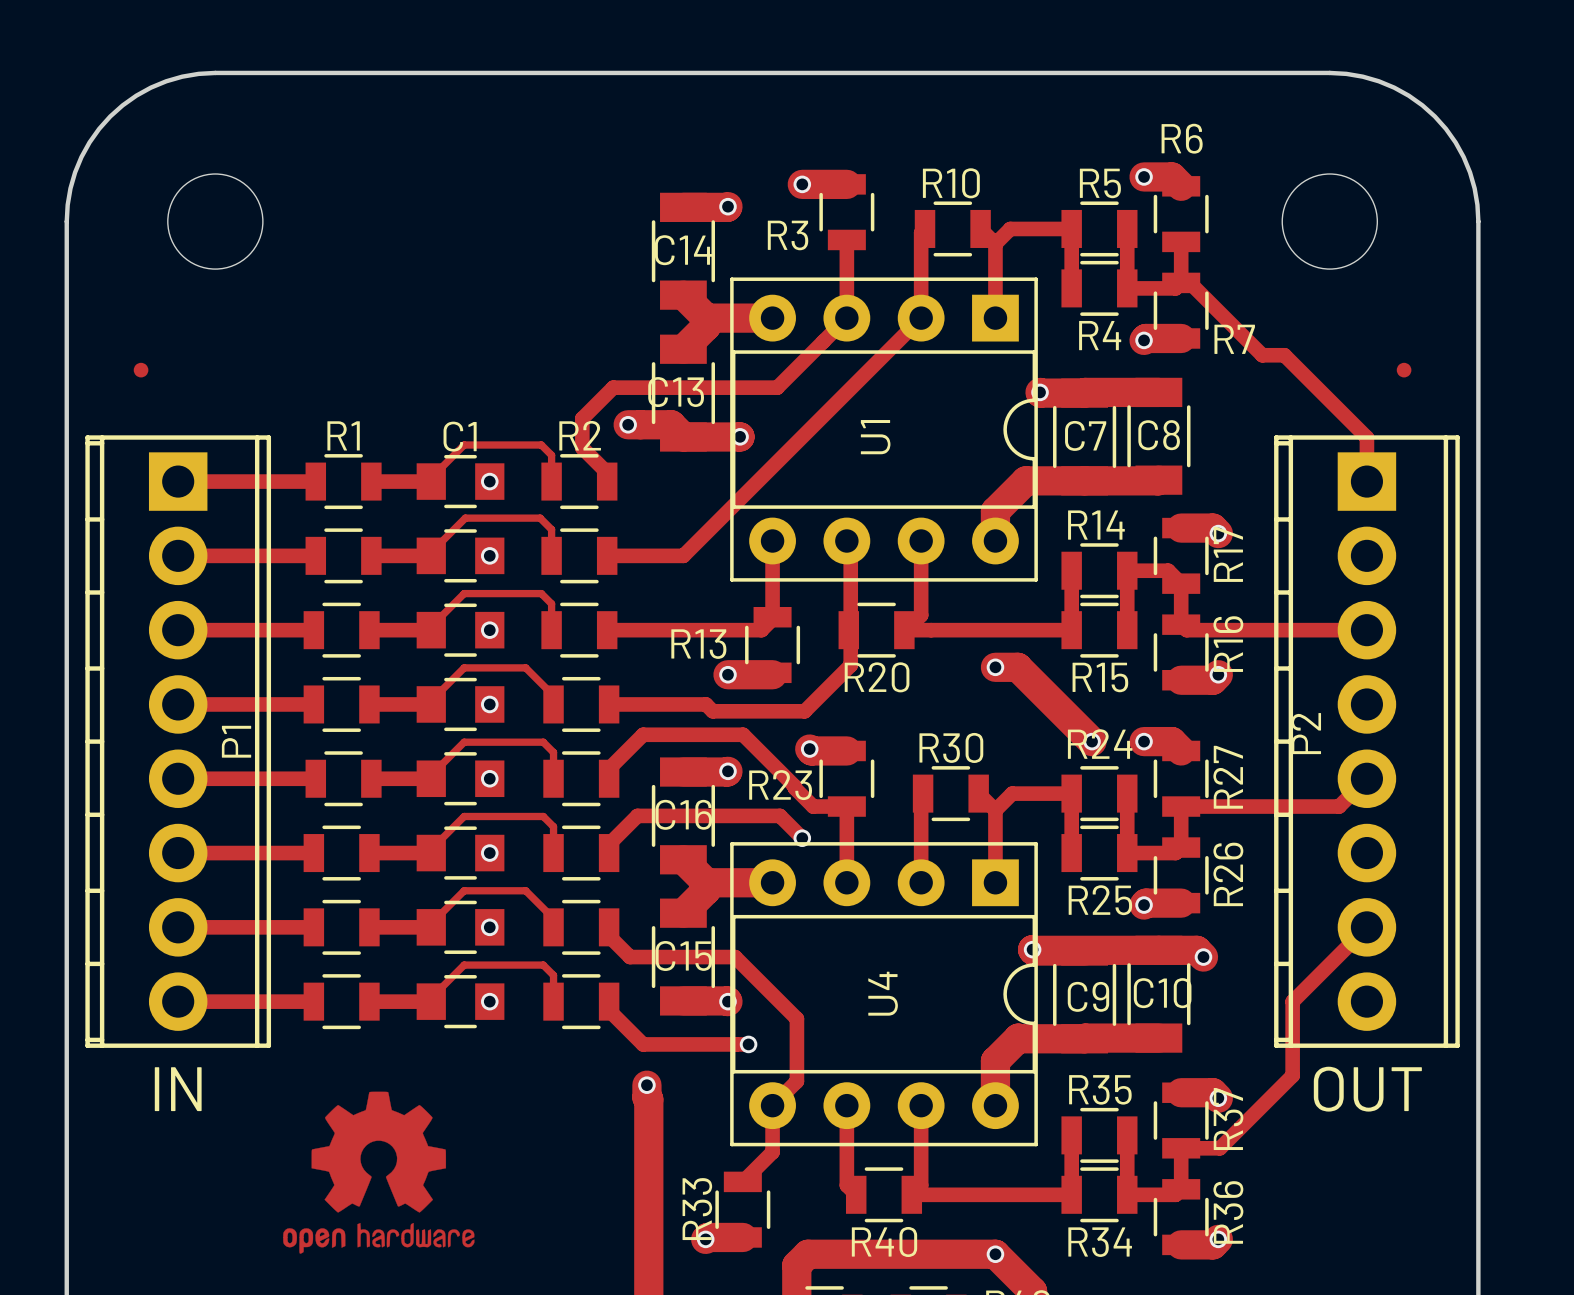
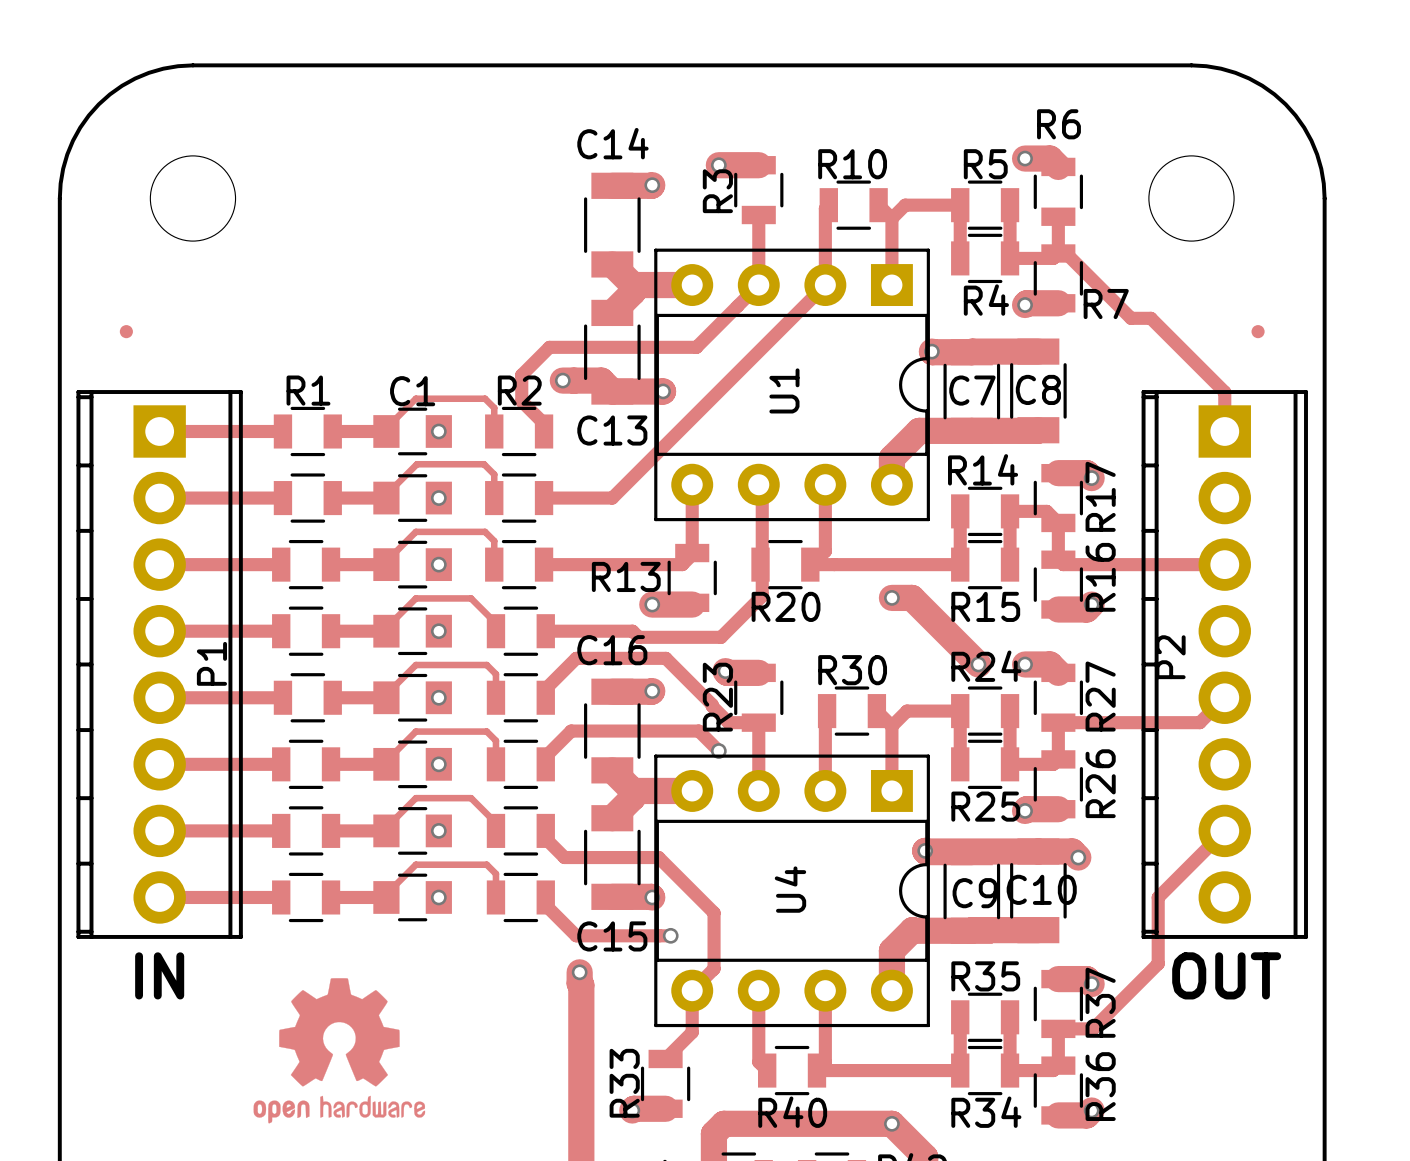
R3 name rotation: 0° (788, 235) -> 90° counterclockwise (717, 191)
C14 name position: C14 (683, 250) -> C14 (612, 143)
C13 name position: C13 (676, 392) -> C13 (612, 430)
R23 name rotation: 0° (780, 785) -> 90° counterclockwise (717, 697)
C16 name position: C16 (683, 814) -> C16 (612, 650)
C15 name position: C15 (683, 955) -> C15 (612, 936)

